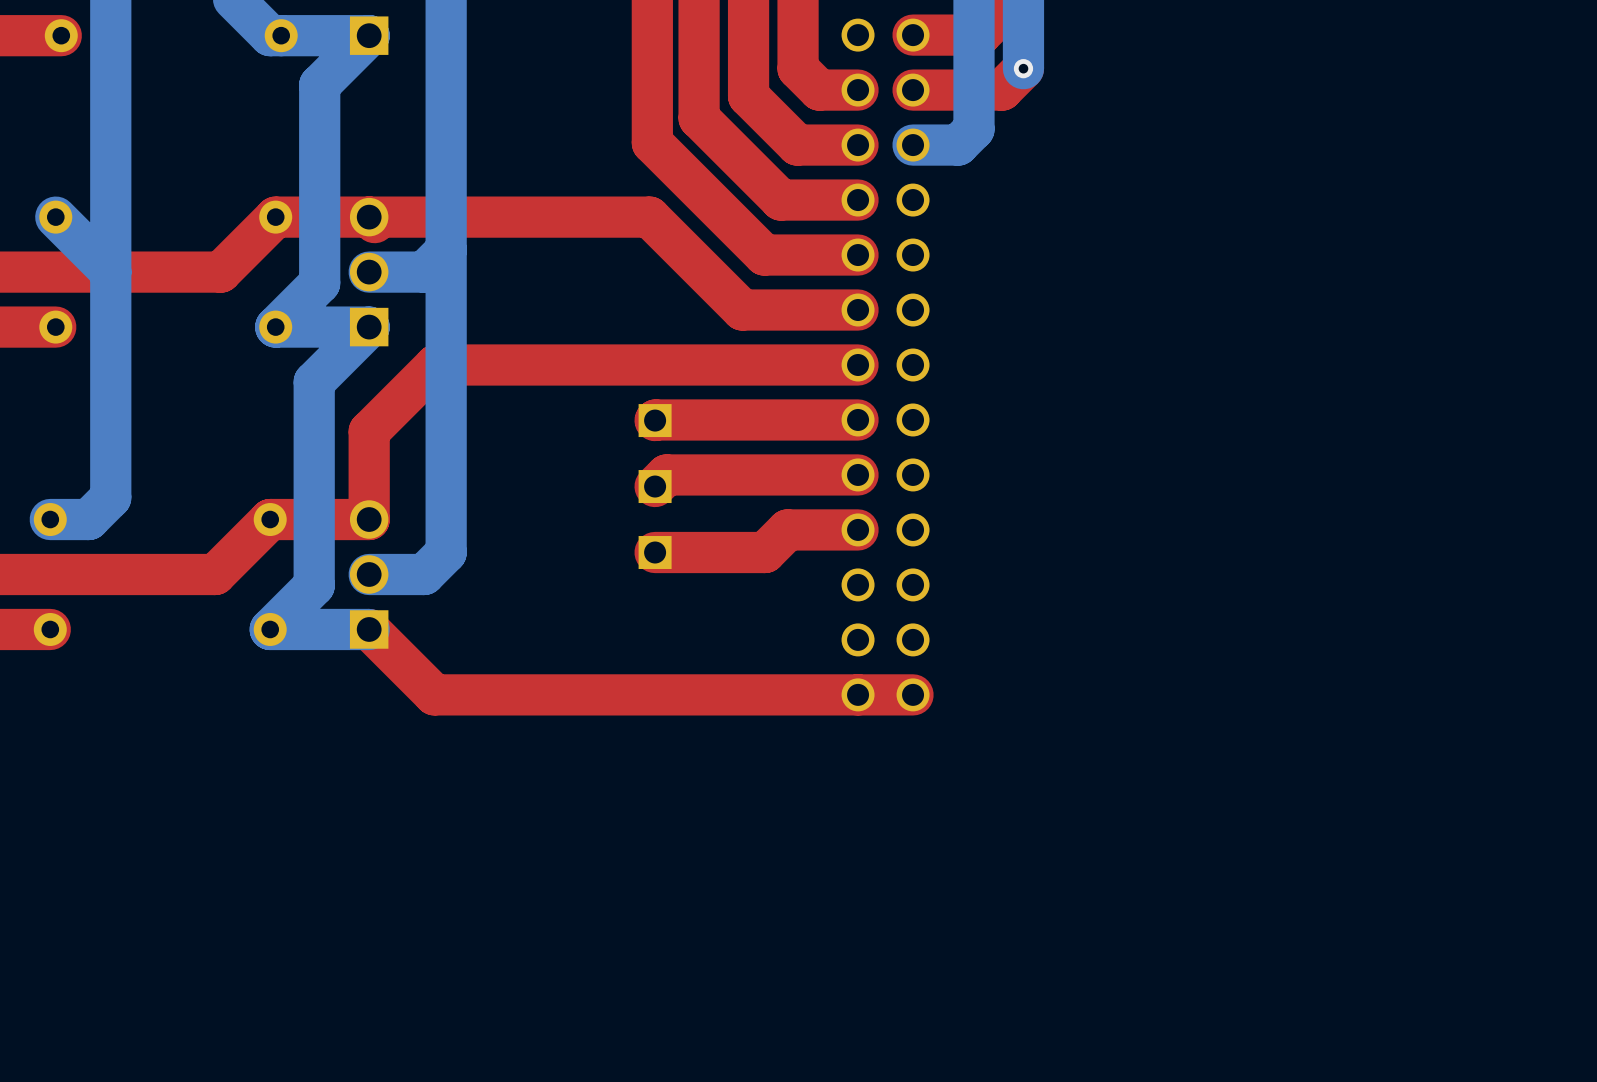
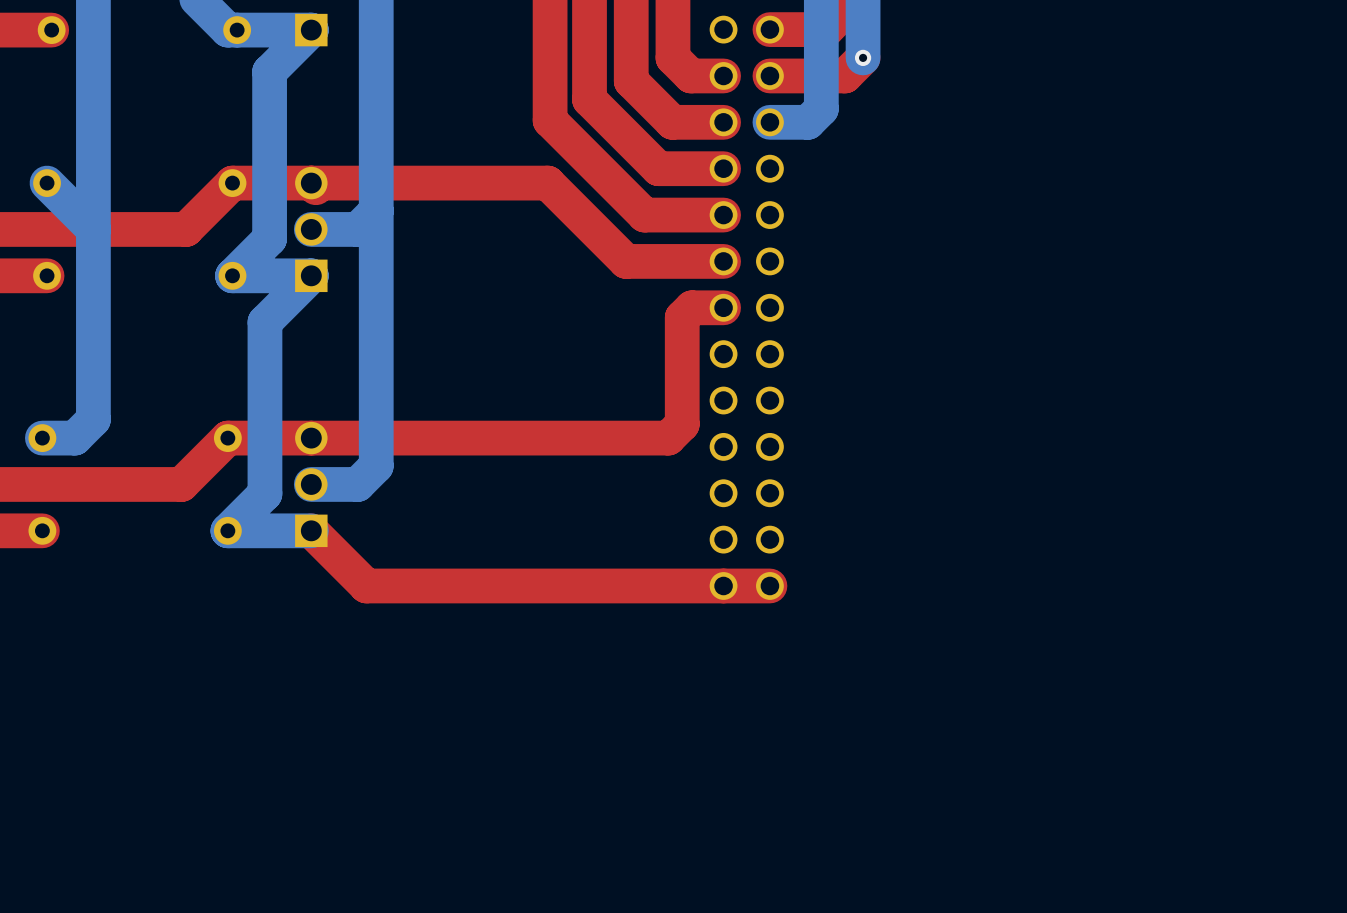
top track: (820, 364) (435, 364) (369, 431) (369, 519) -> (692, 307) (682, 317) (682, 424) (668, 438) (311, 438)
top track: (858, 419) (655, 420) -> none
part: (655, 420) -> none
top track: (858, 474) (666, 474) (655, 486) -> none
part: (655, 486) -> none
top track: (858, 529) (787, 529) (765, 552) (655, 552) -> none
part: (655, 552) -> none

